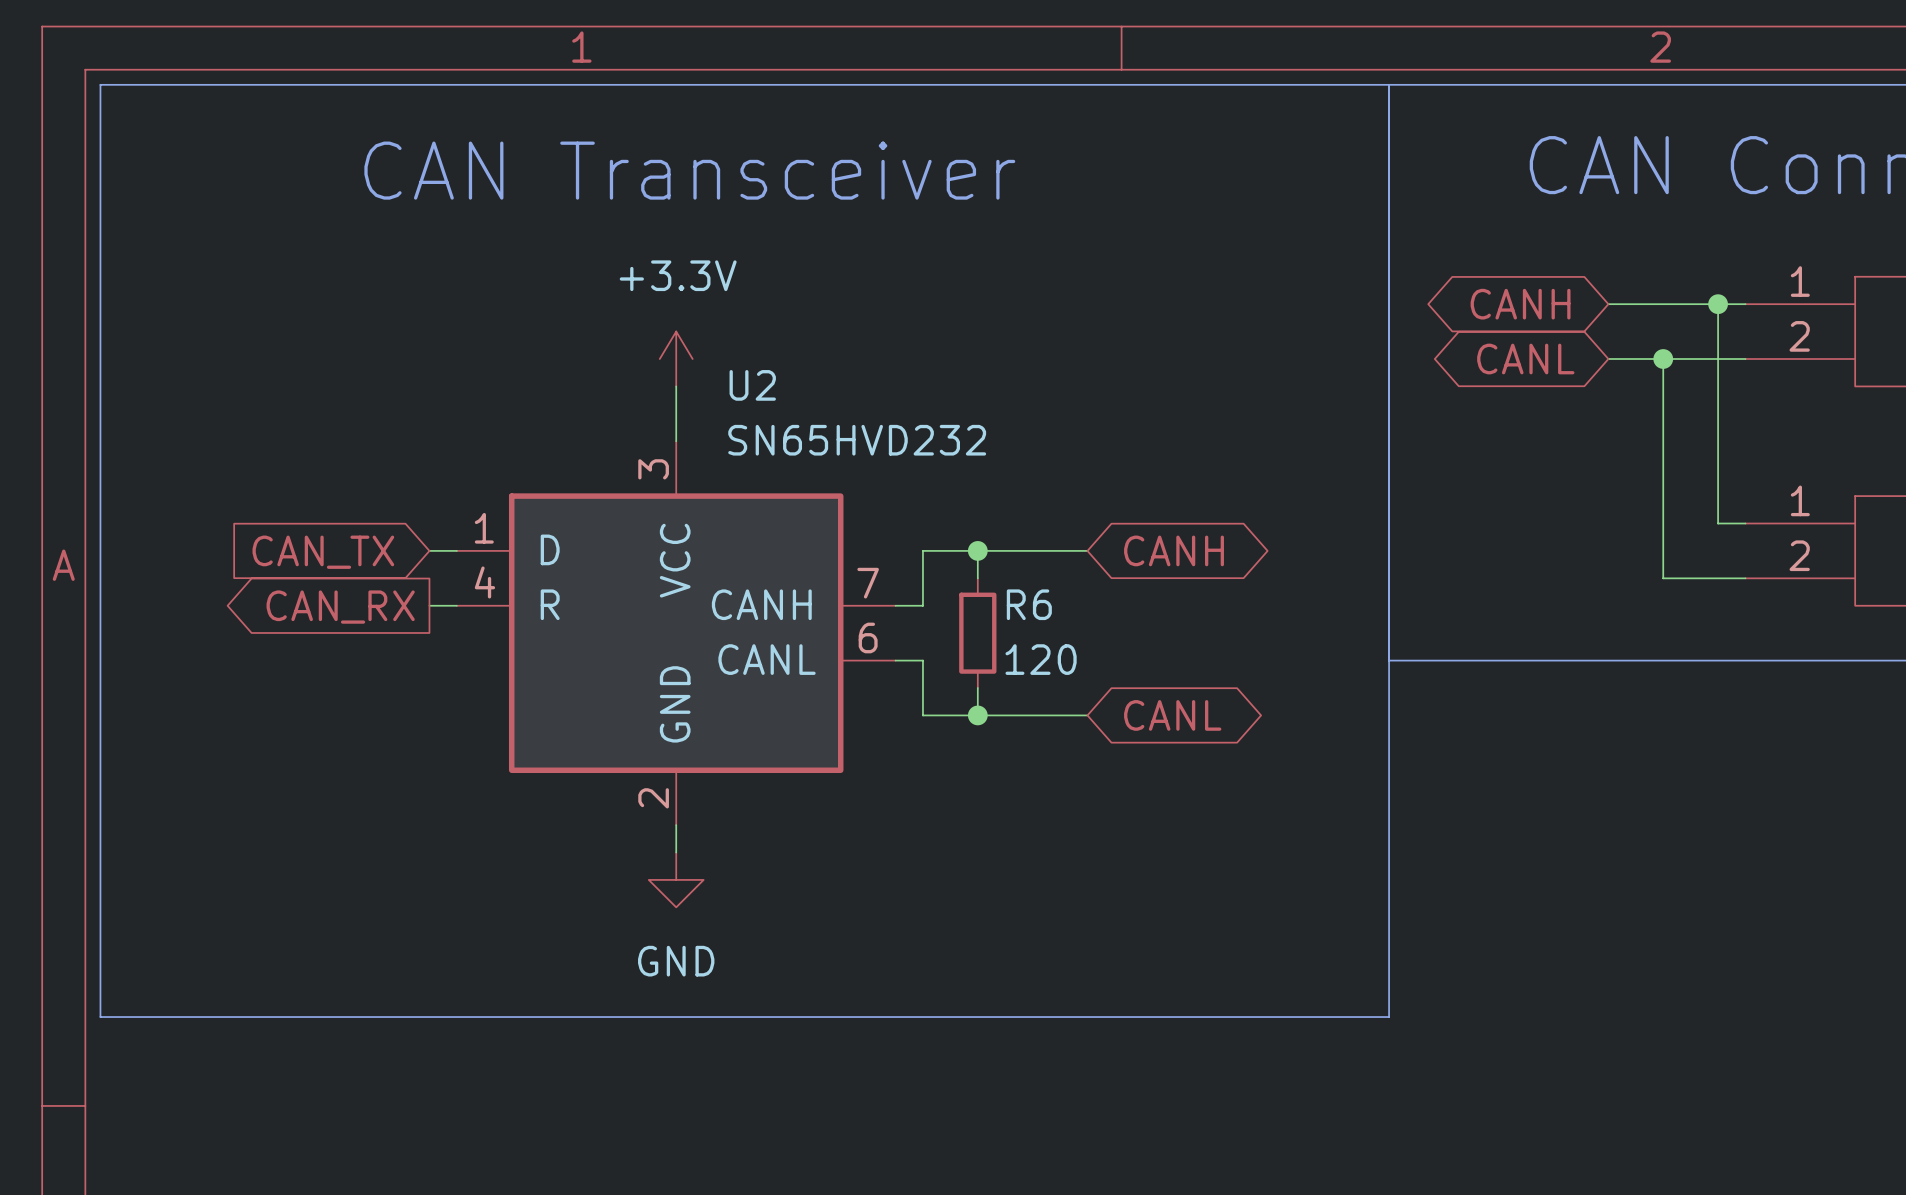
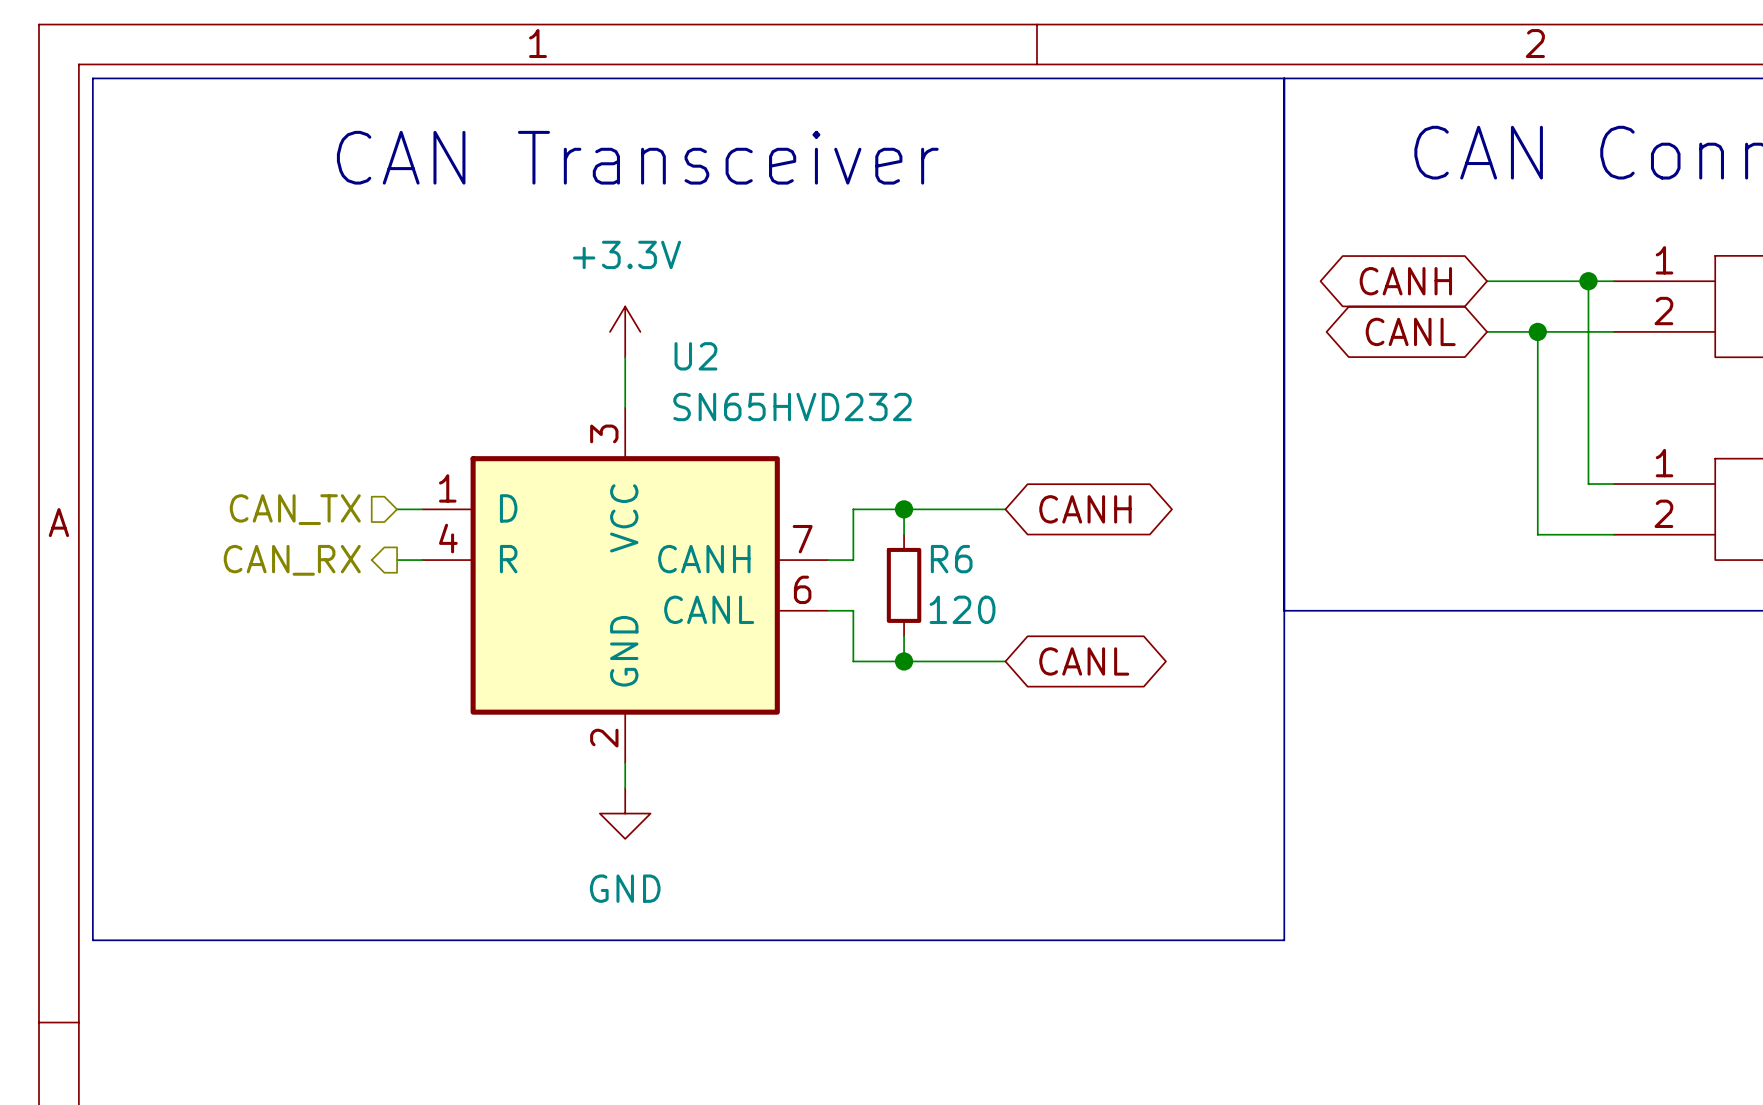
hierarchical label: none -> CAN_TX (295, 509)
global label: CAN_TX (323, 552) -> none
hierarchical label: none -> CAN_RX (292, 560)
global label: CAN_RX (340, 607) -> none

